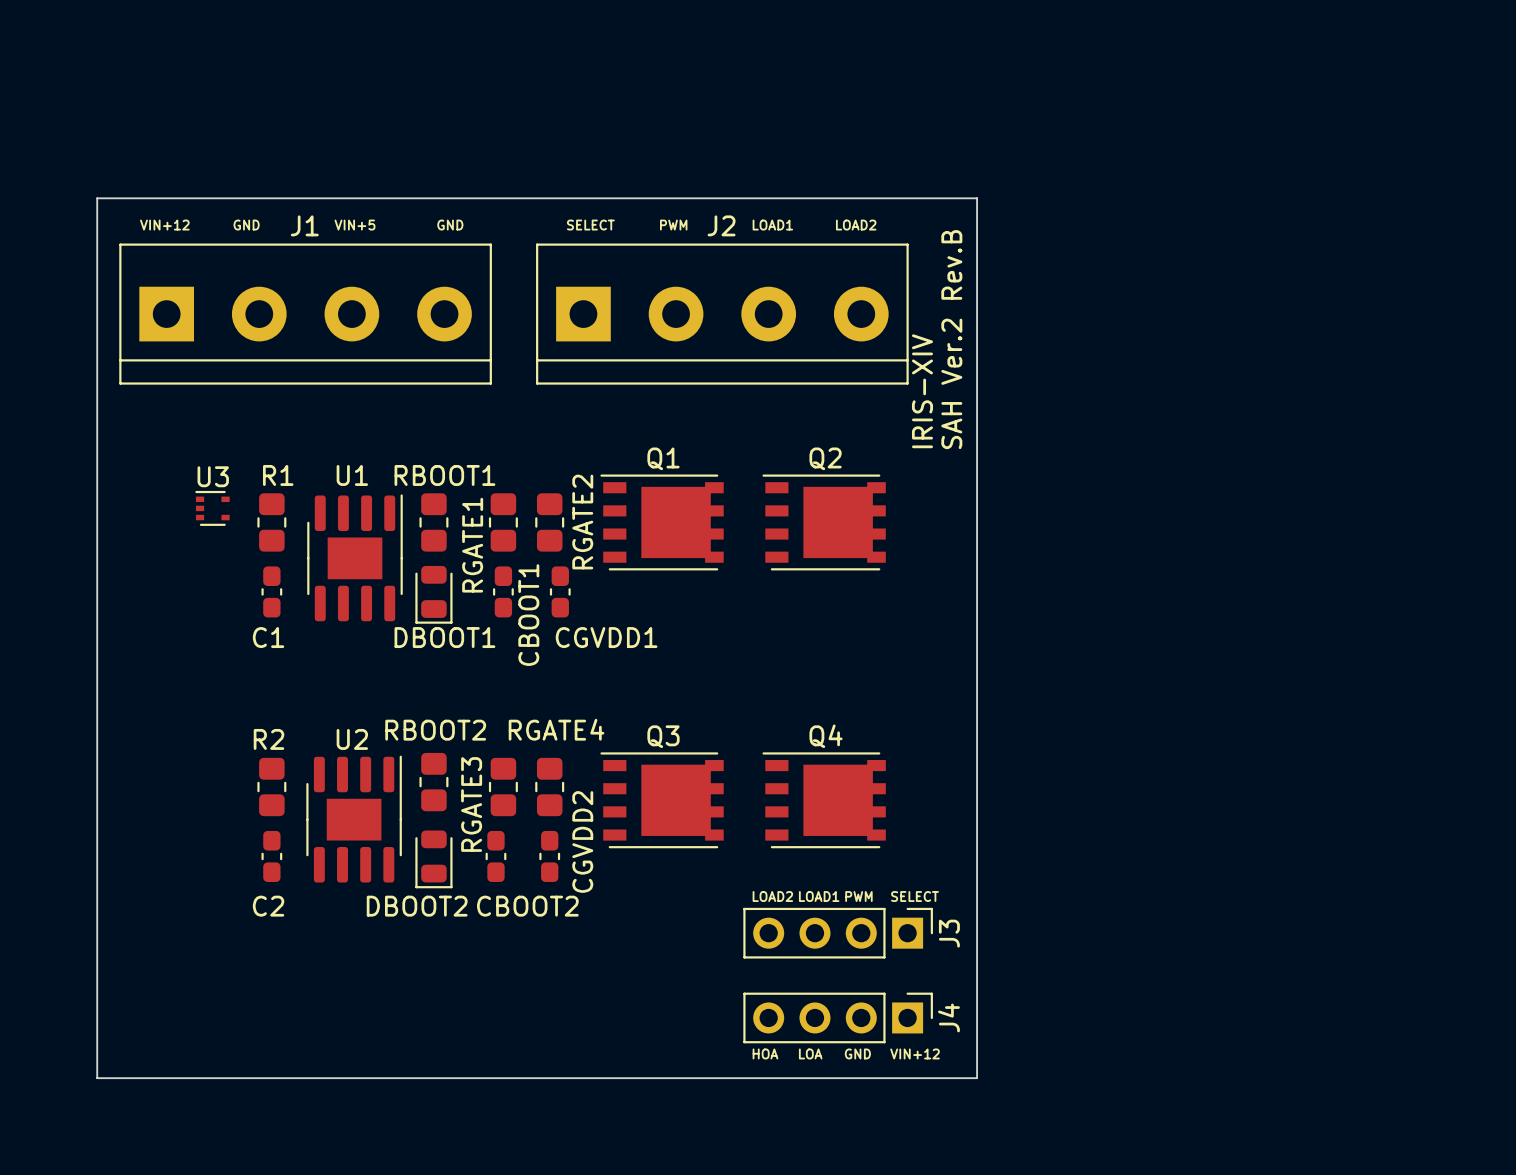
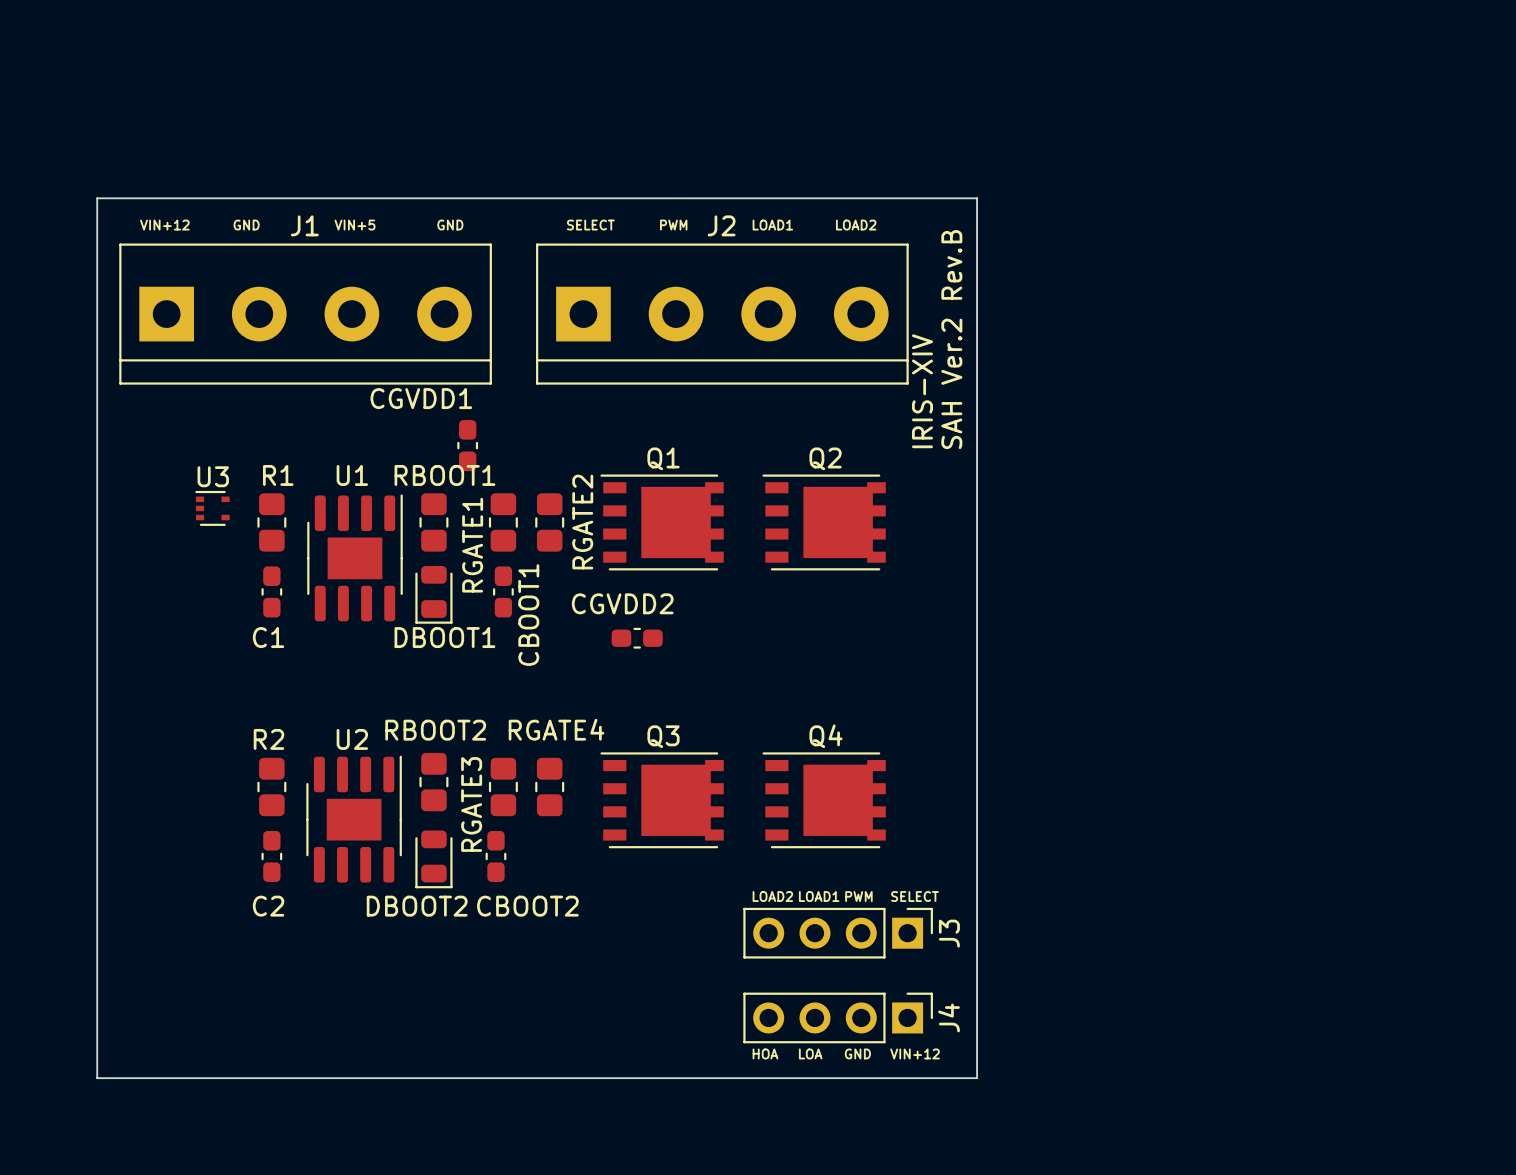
CGVDD1 position: (560, 591) -> (467, 445)
CGVDD1 name position: CGVDD1 (606, 637) -> CGVDD1 (421, 398)
CGVDD2 name position: CGVDD2 (582, 841) -> CGVDD2 (622, 603)
CGVDD2 rotation: 0° (549, 856) -> 90° clockwise (637, 638)
CGVDD2 position: (549, 856) -> (637, 638)

